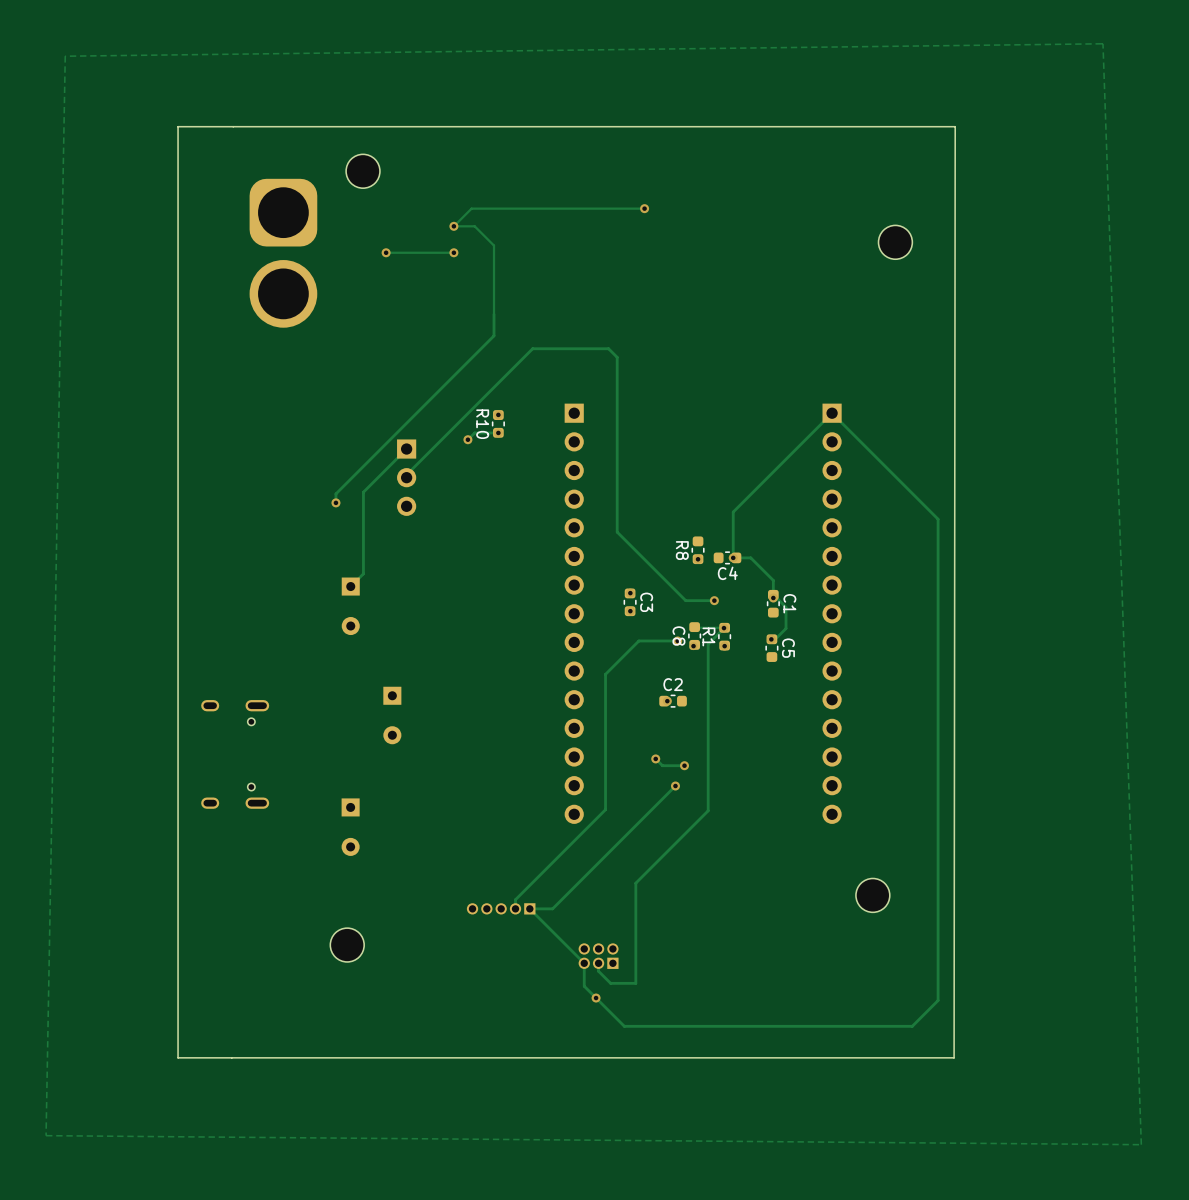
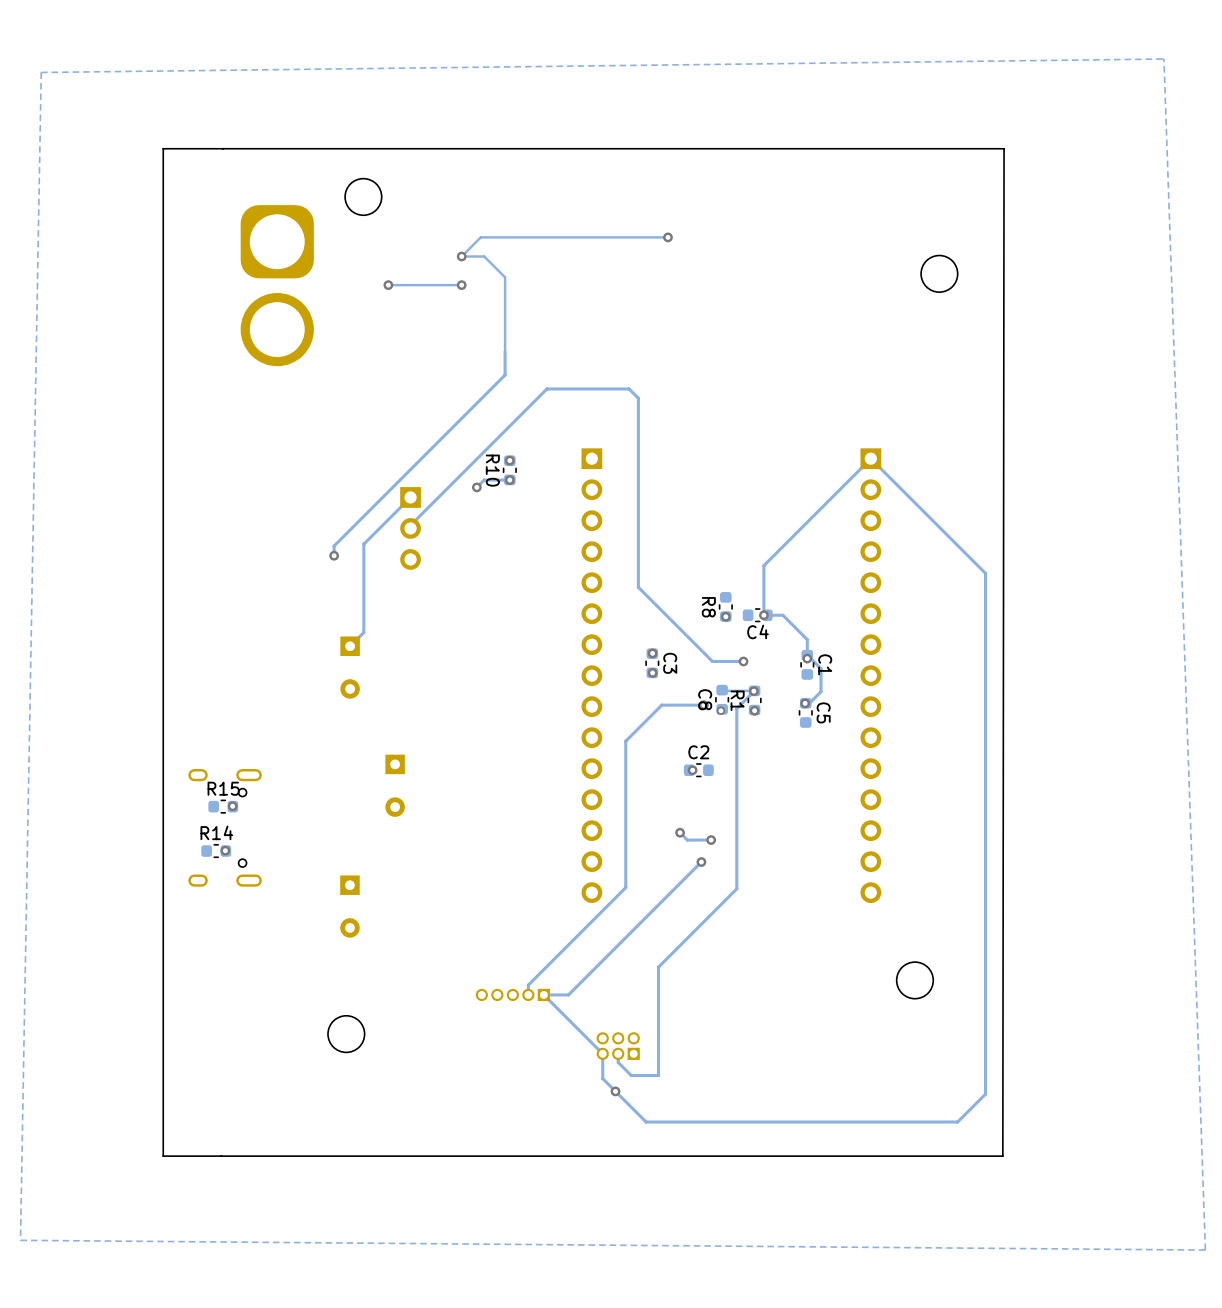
R15: none -> (223, 806)
via: none -> (232, 806)
R14: none -> (216, 851)
via: none -> (225, 850)

